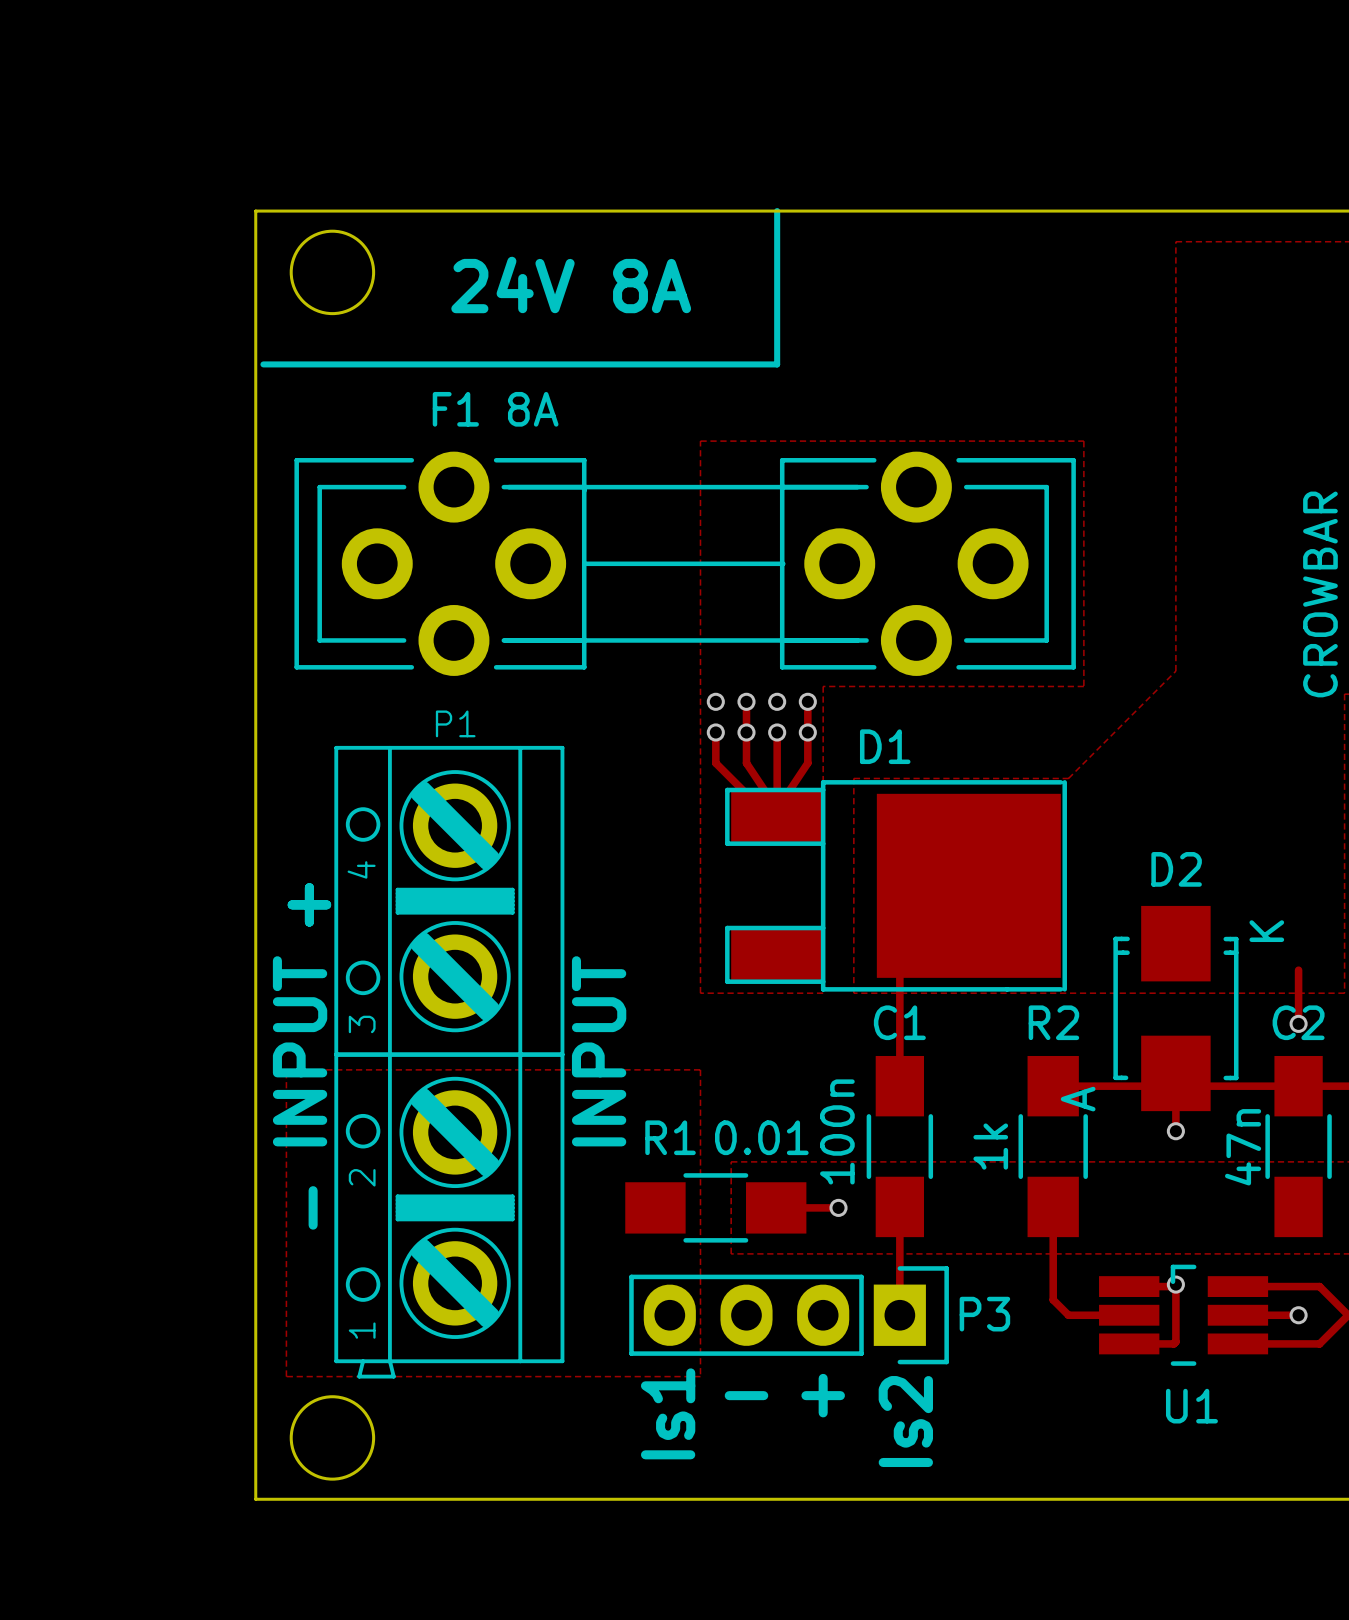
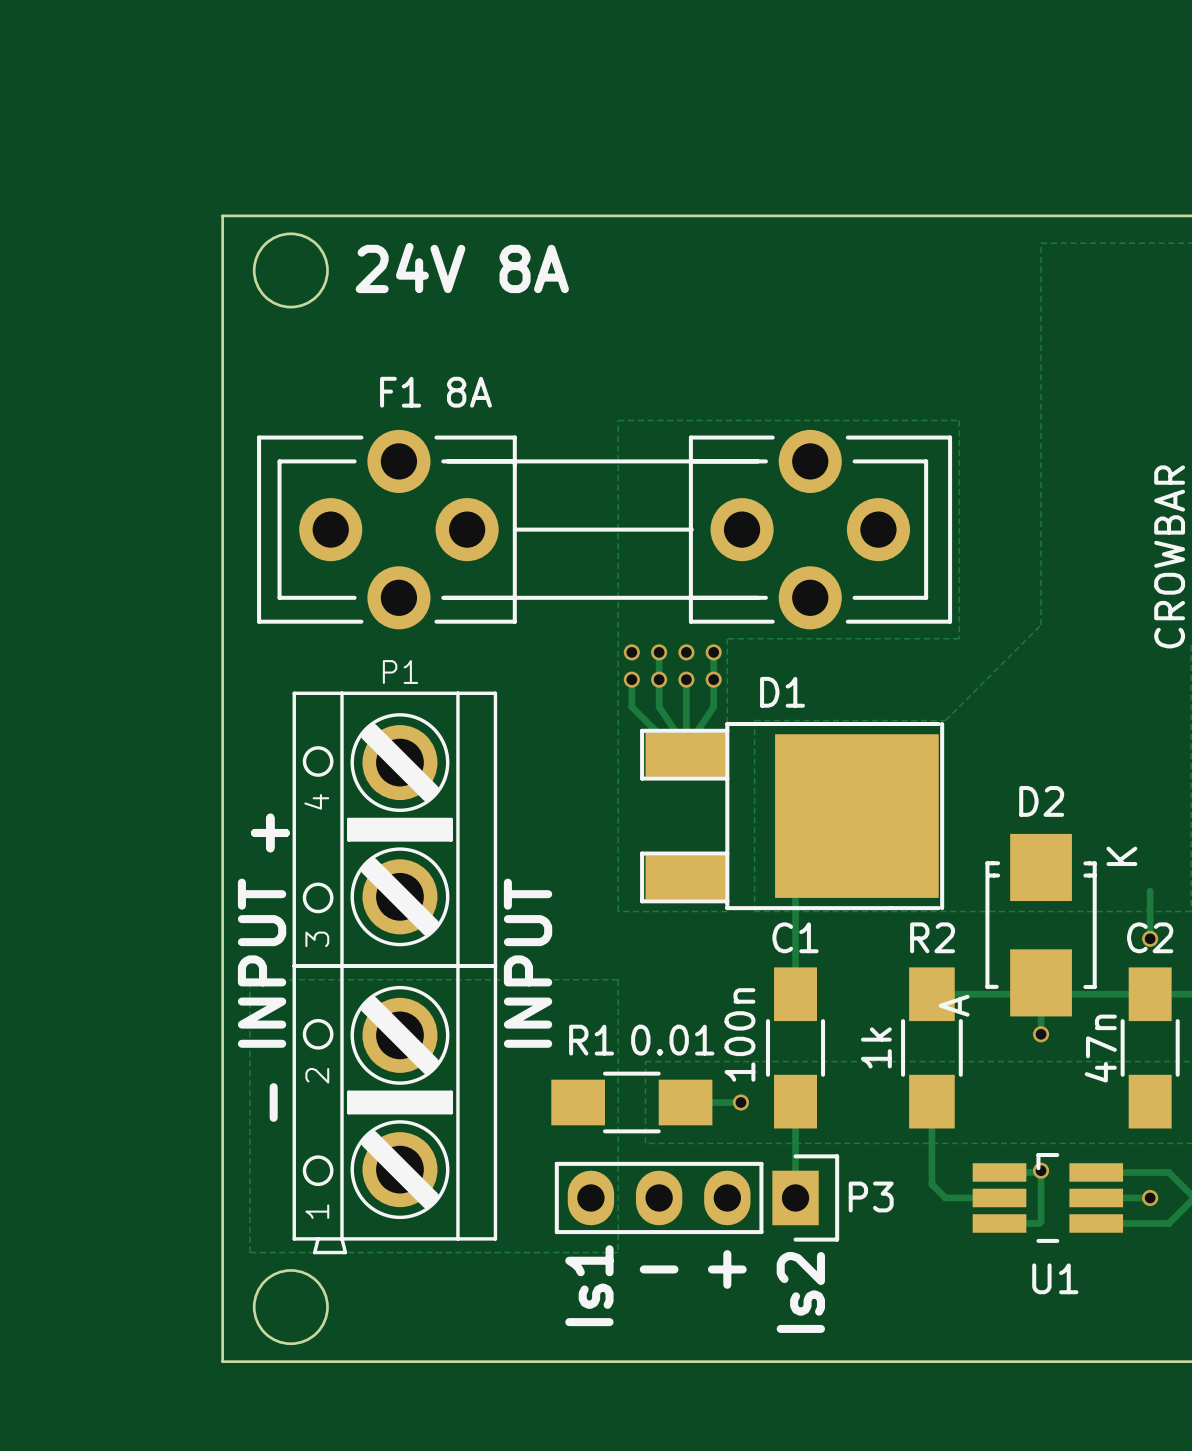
line: (777, 211) (777, 364) (263, 364) -> none
text position: 24V 8A (571, 284) -> 24V 8A (462, 267)

